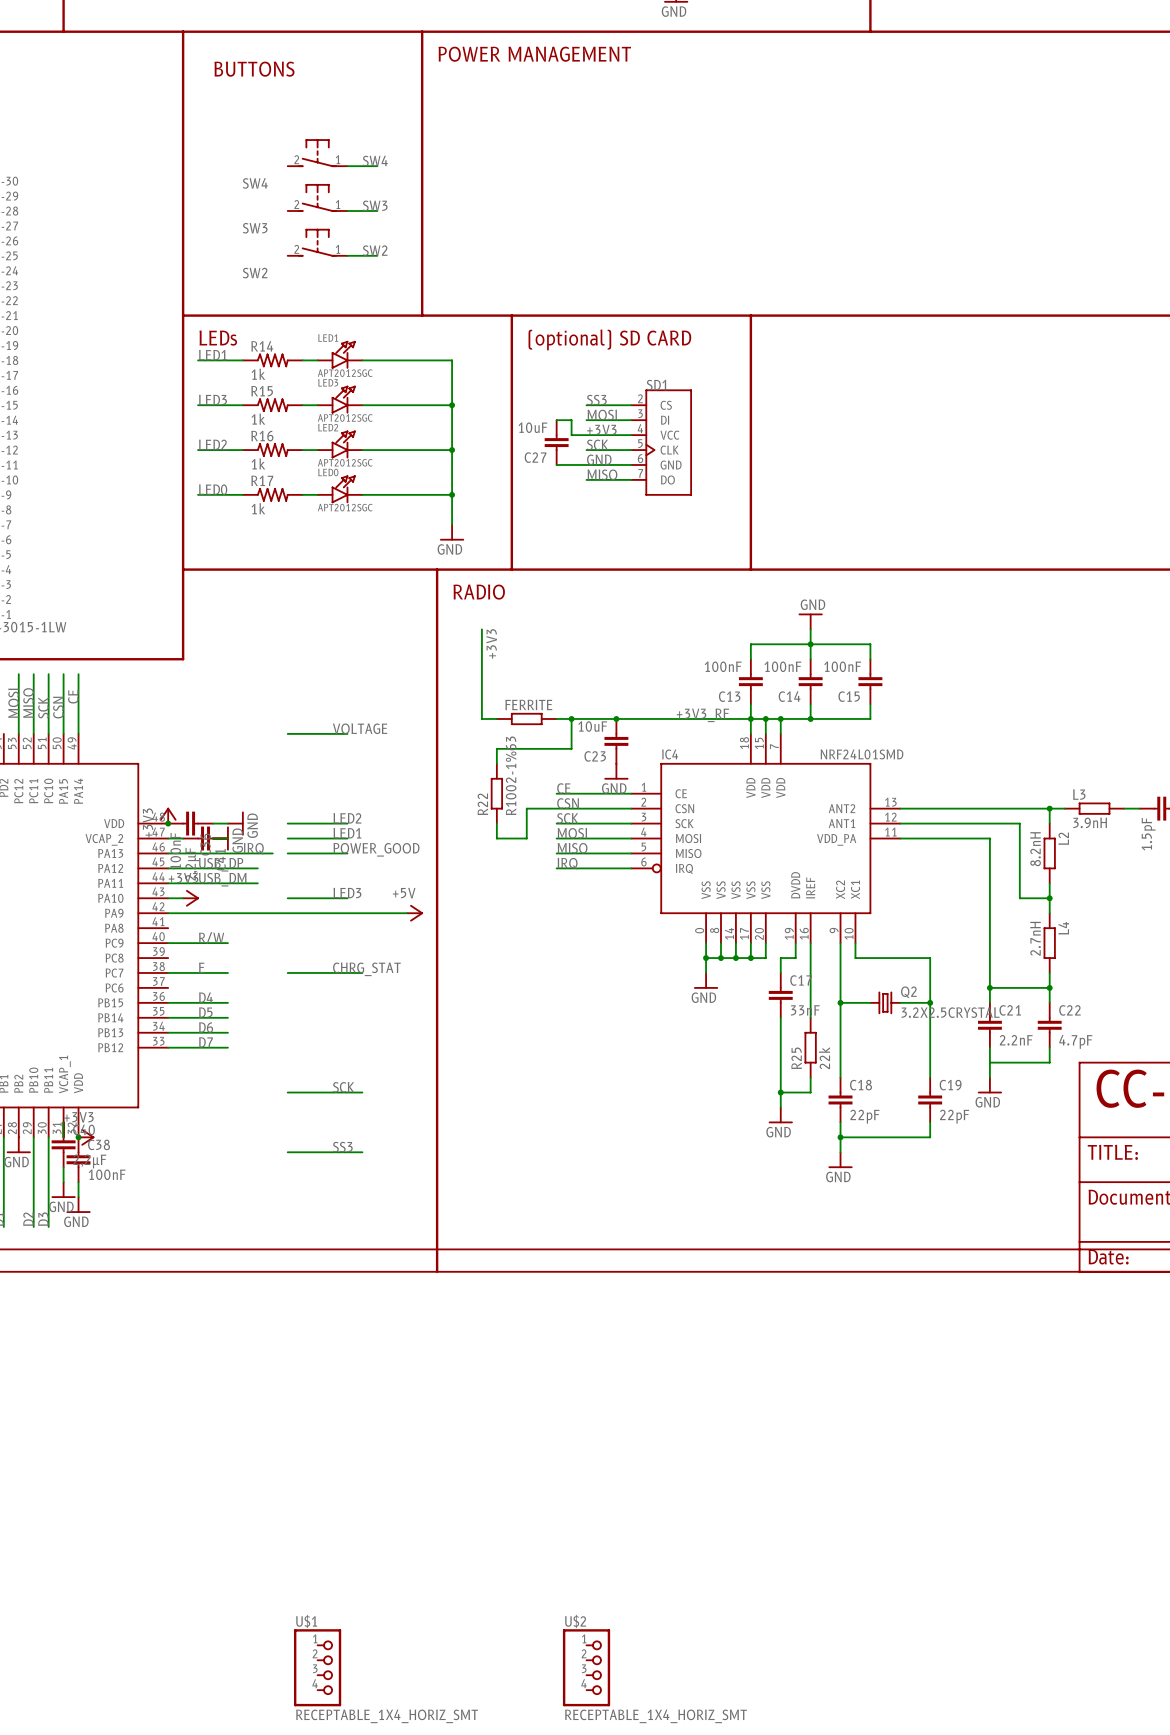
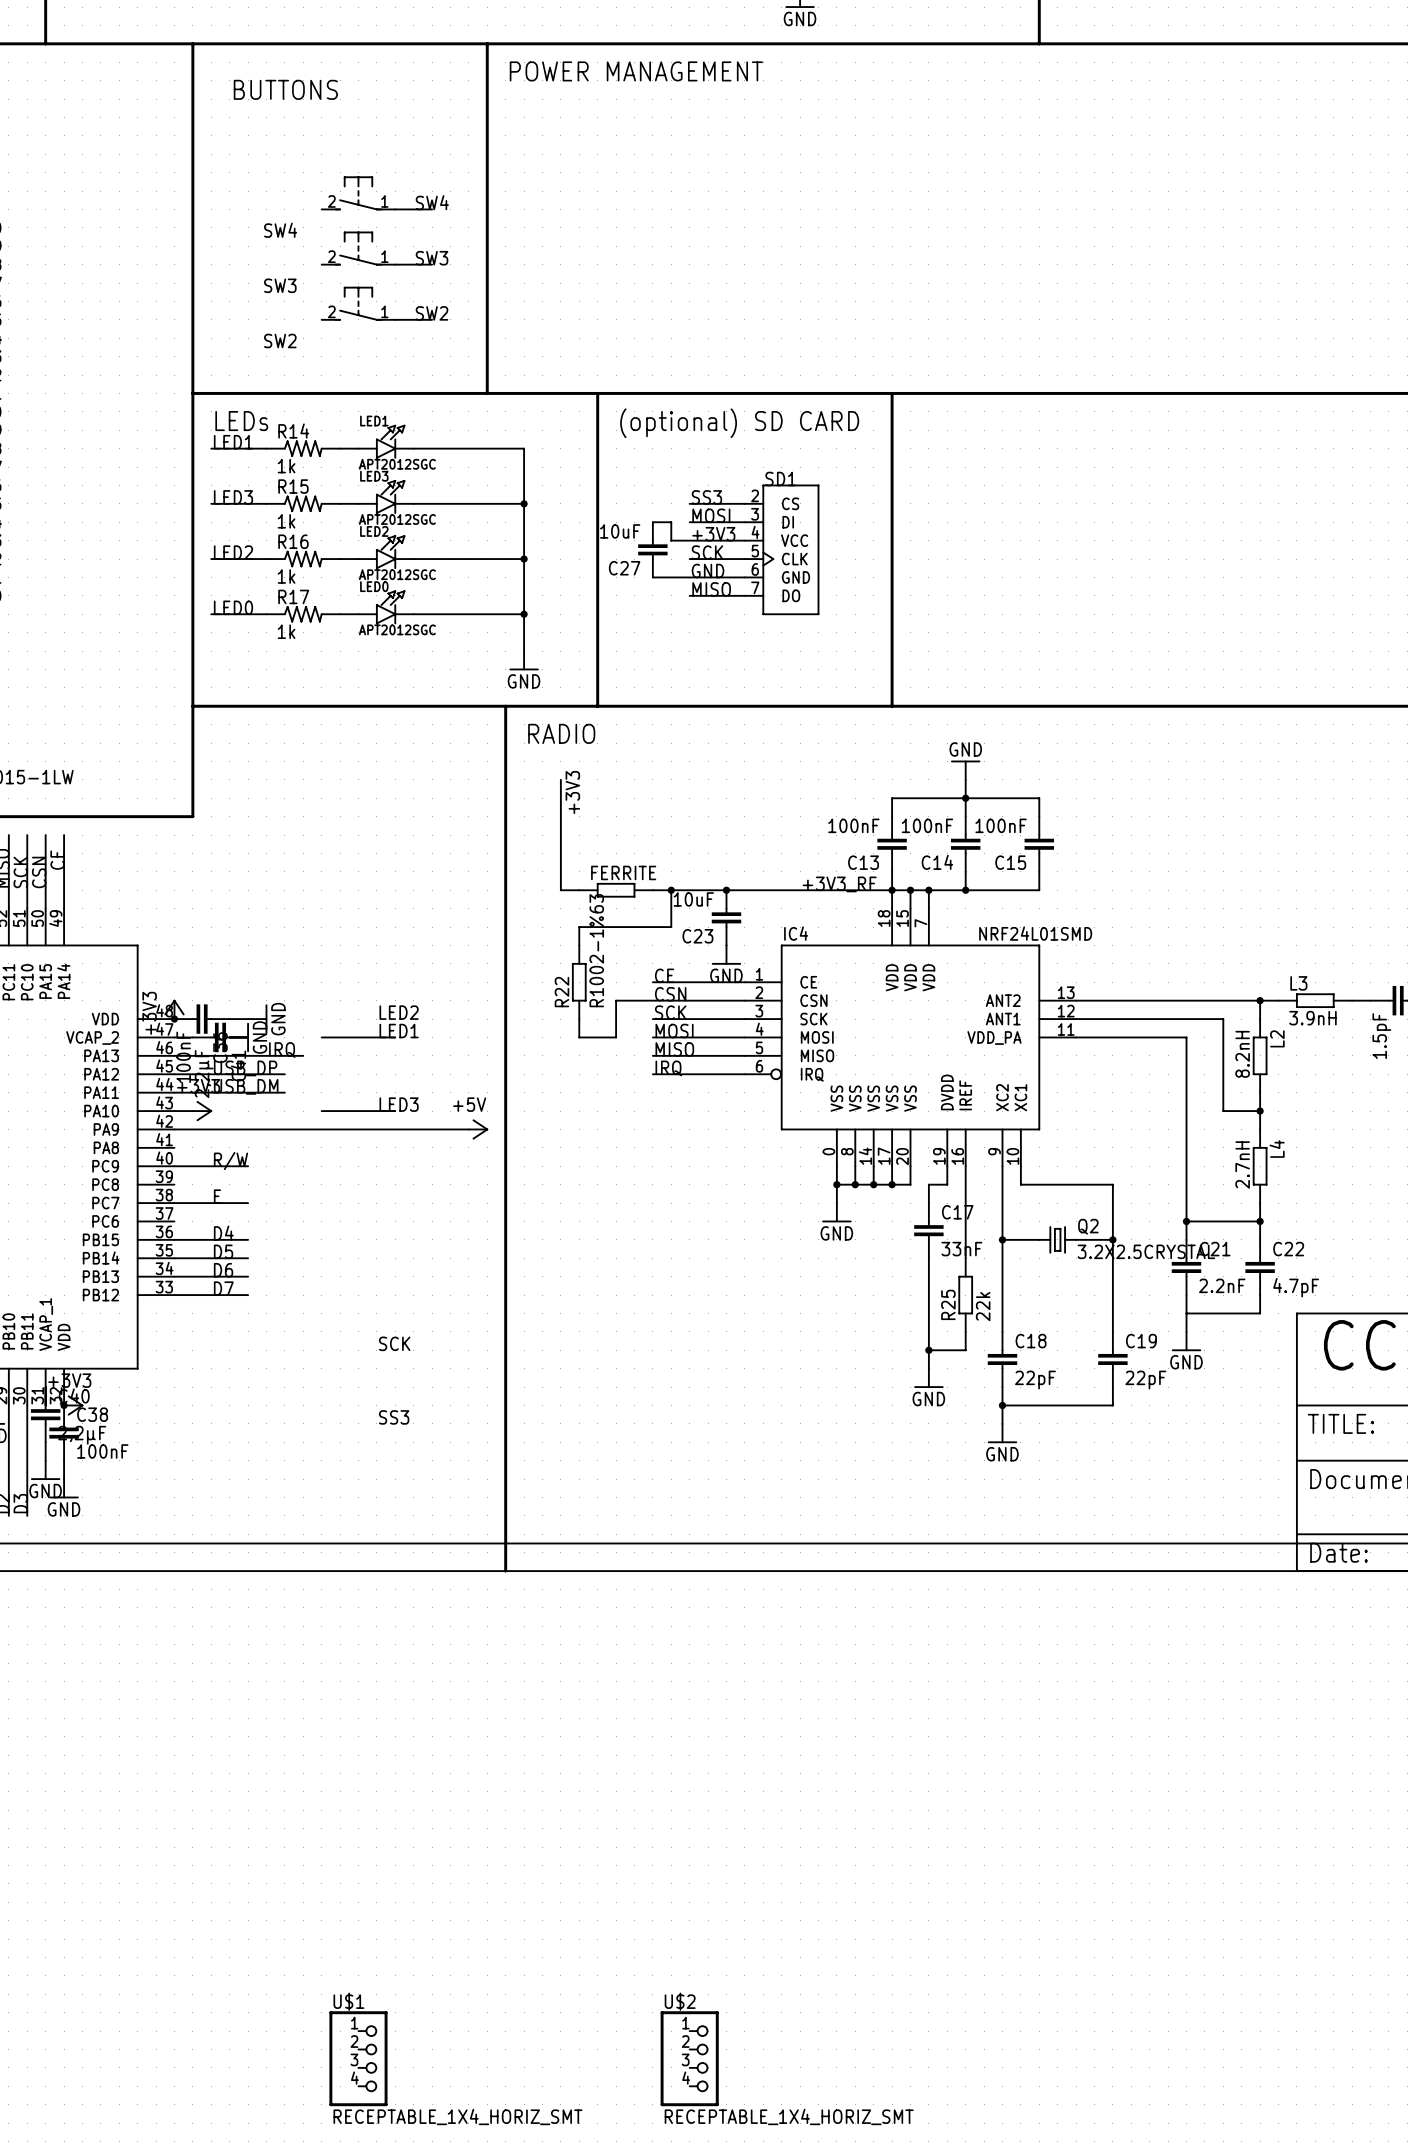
label: VOLTAGE (360, 728) -> none
wire: (287, 733) (347, 733) -> none
wire: (287, 823) (347, 823) -> none
label: POWER_GOOD (376, 849) -> none
wire: (287, 853) (347, 853) -> none
label: CHRG_STAT (366, 969) -> none
wire: (287, 972) (362, 972) -> none
wire: (287, 1092) (362, 1092) -> none
wire: (287, 1152) (362, 1152) -> none

